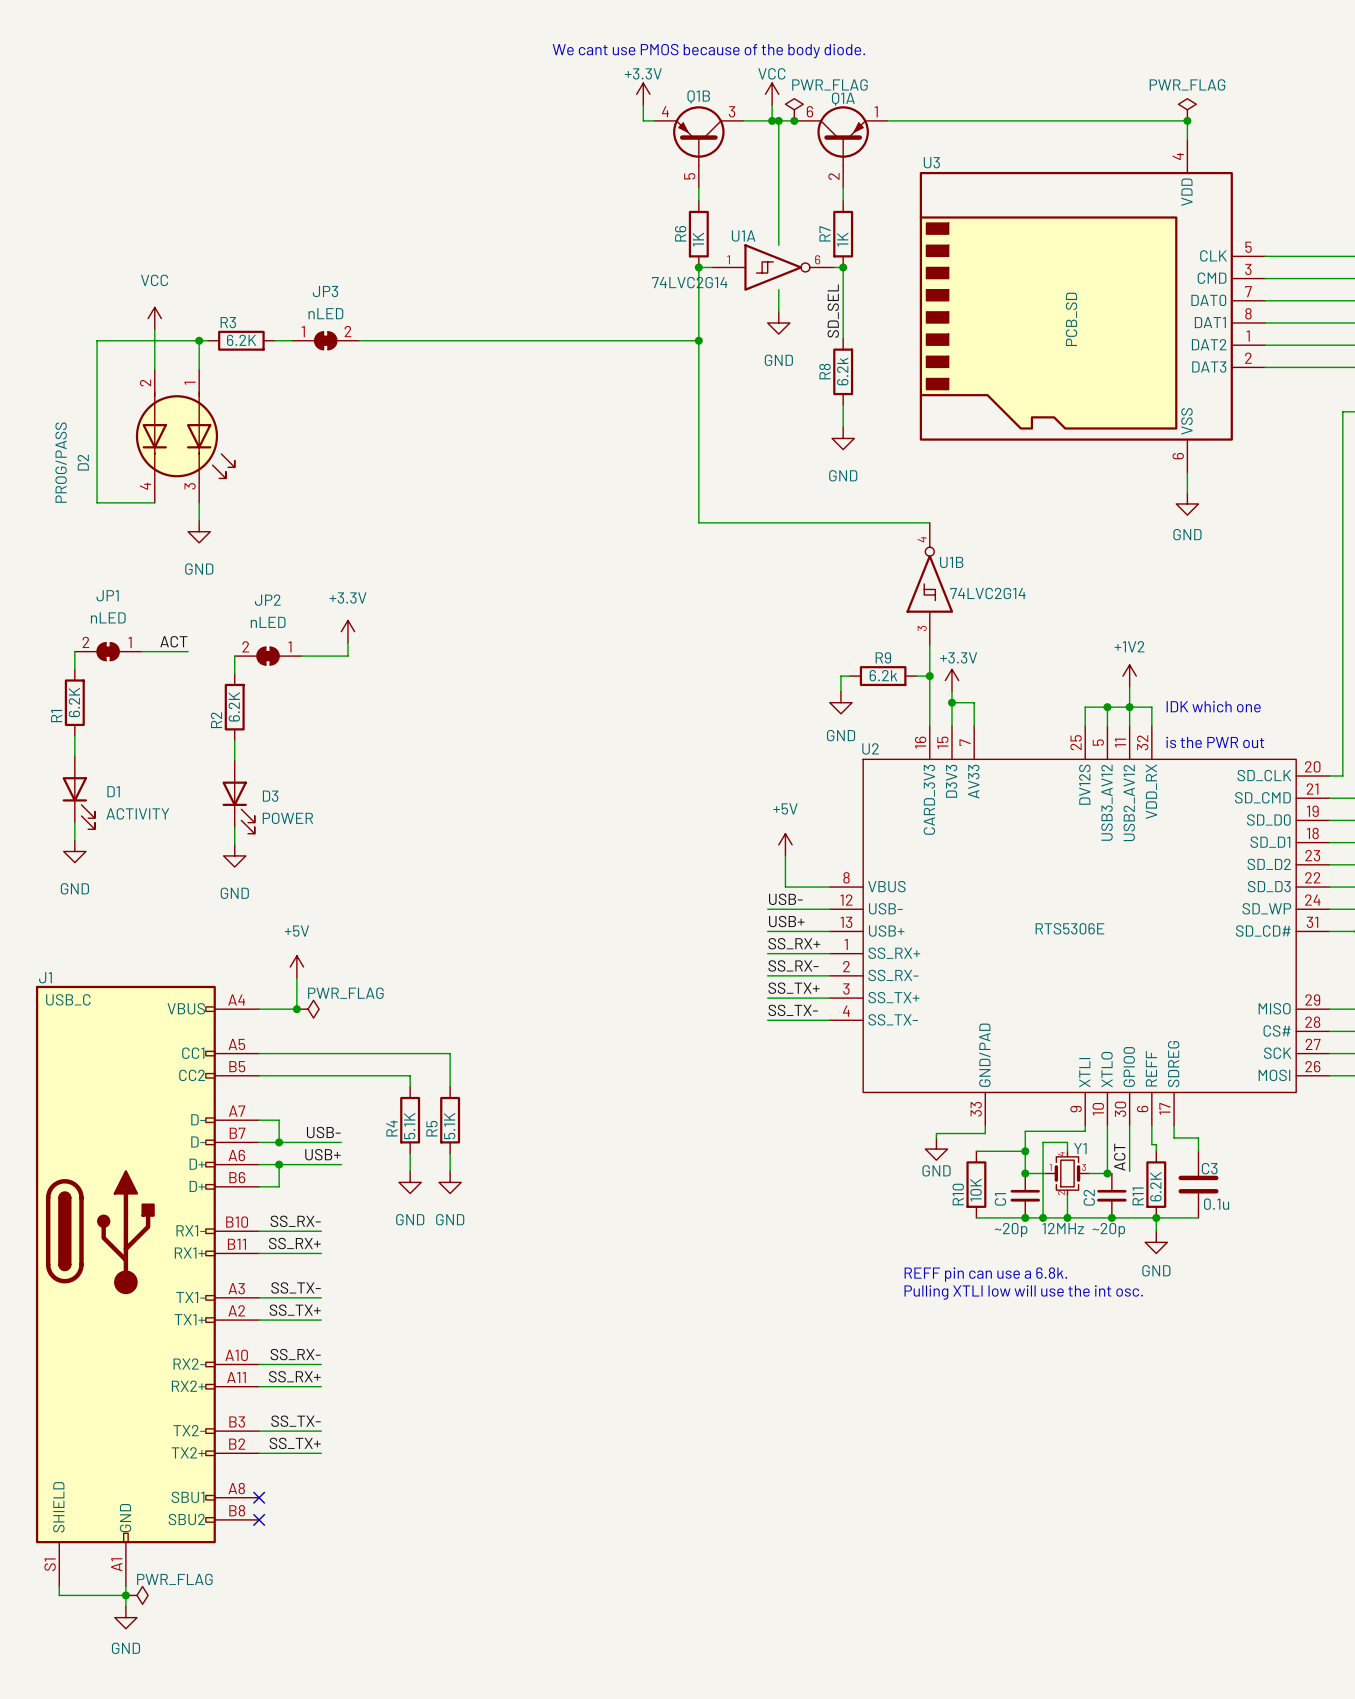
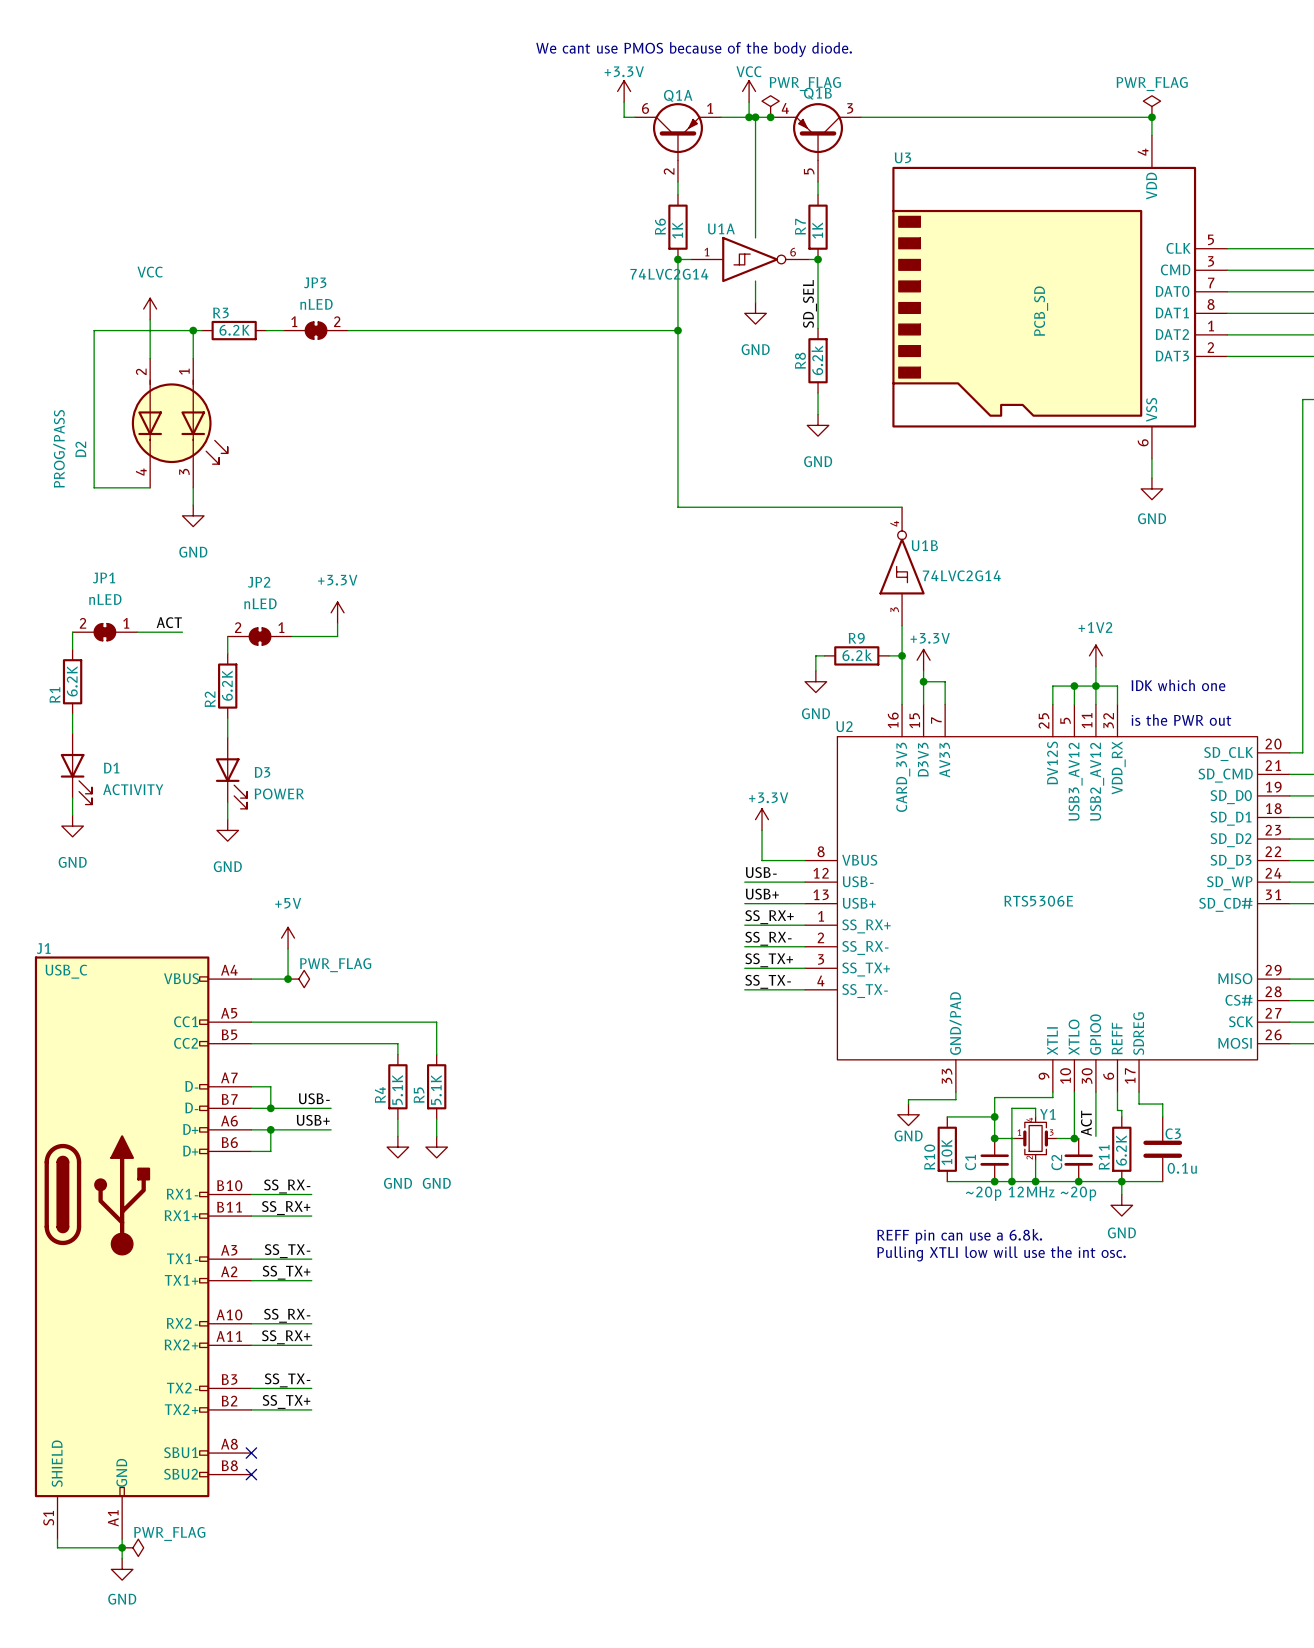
Q1B position: (698, 146) -> (818, 142)
Q1A position: (843, 146) -> (677, 142)
power symbol: +5V (785, 844) -> +3.3V (762, 819)

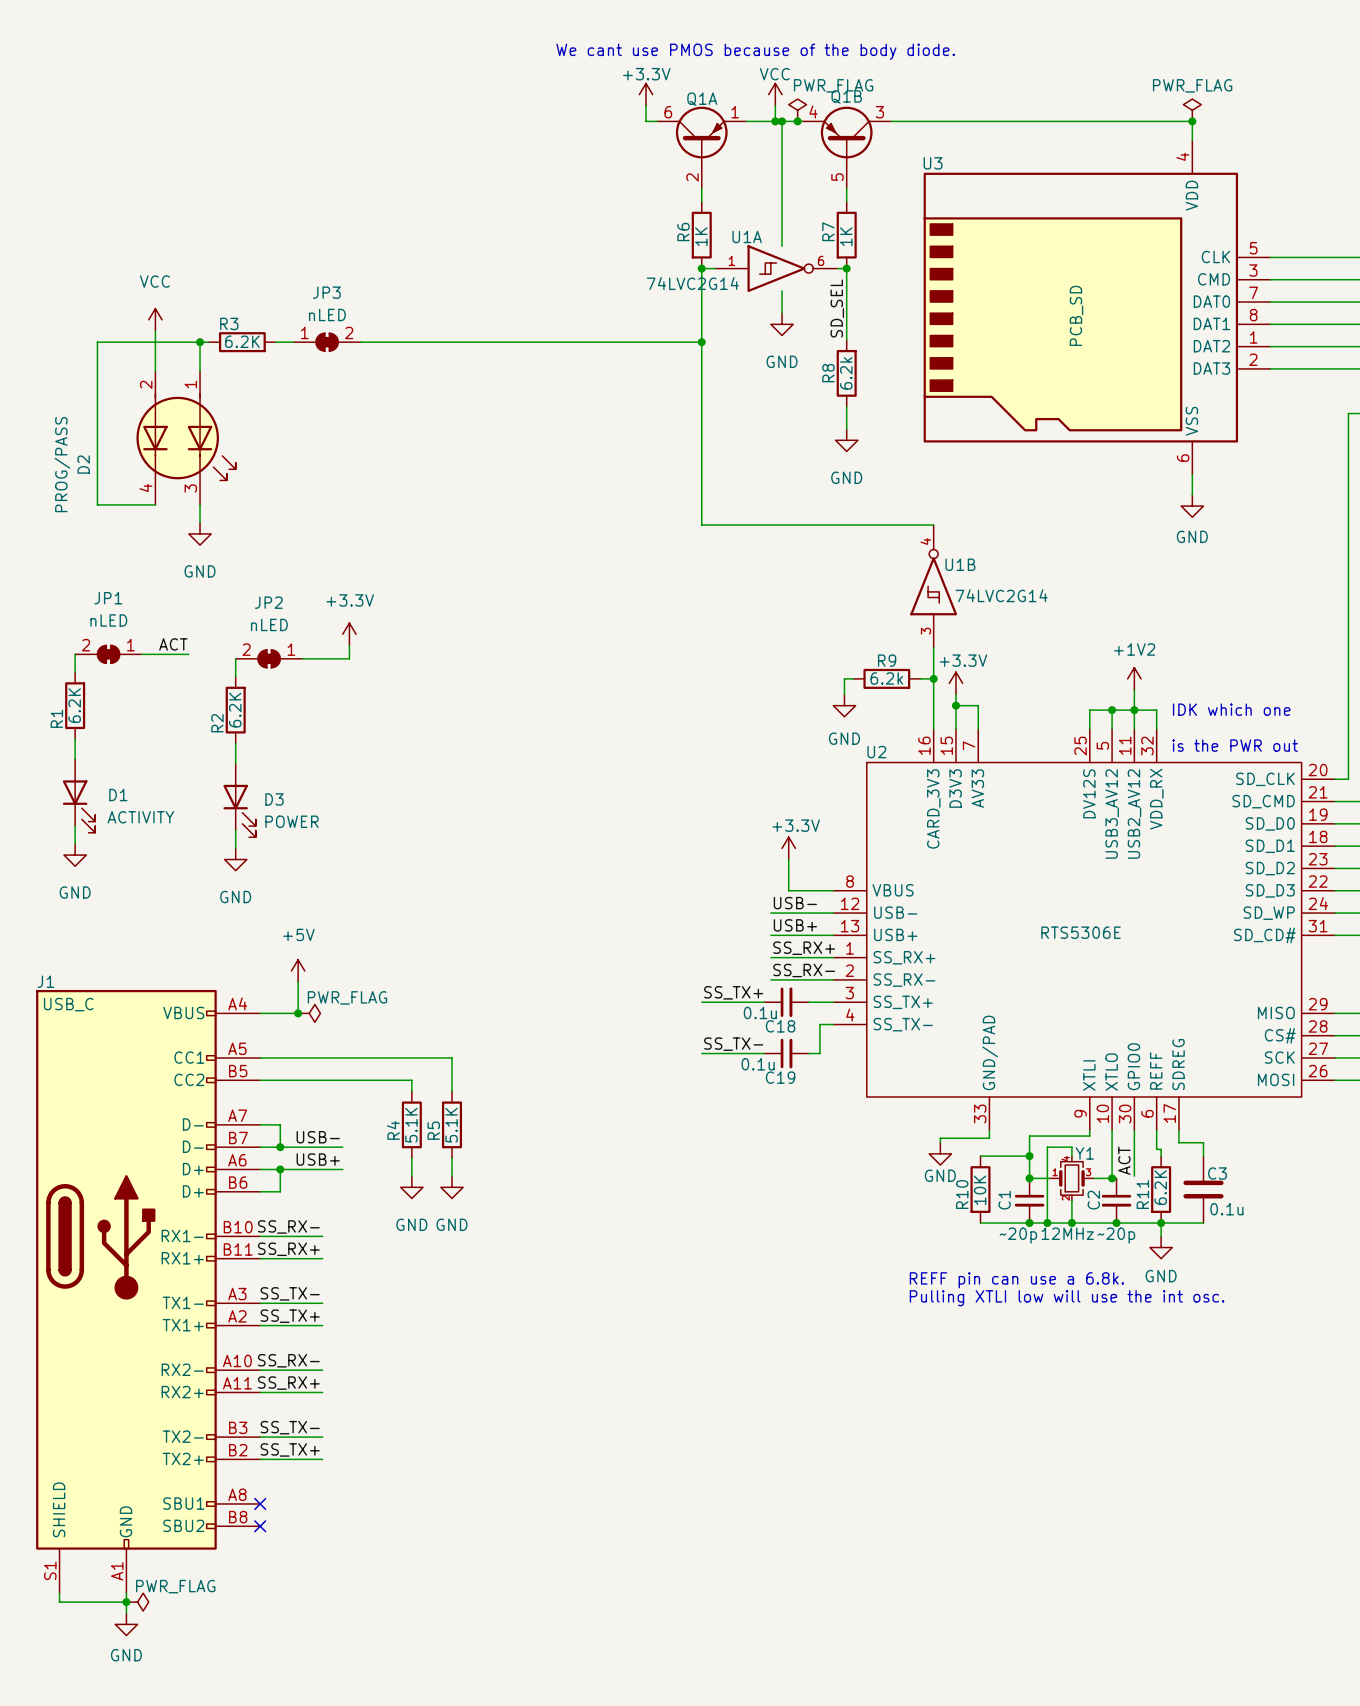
label position: SS_TX+ (769, 960) -> SS_TX+ (733, 992)
wire: none -> (701, 1002) (764, 1002)
C18: none -> 0.1u (786, 1002)
label position: SS_TX- (768, 981) -> SS_TX- (733, 1044)
wire: (744, 989) (792, 989) -> (808, 1053) (819, 1053) (819, 1024)
wire: none -> (701, 1053) (764, 1053)
C19: none -> 0.1u (786, 1053)

